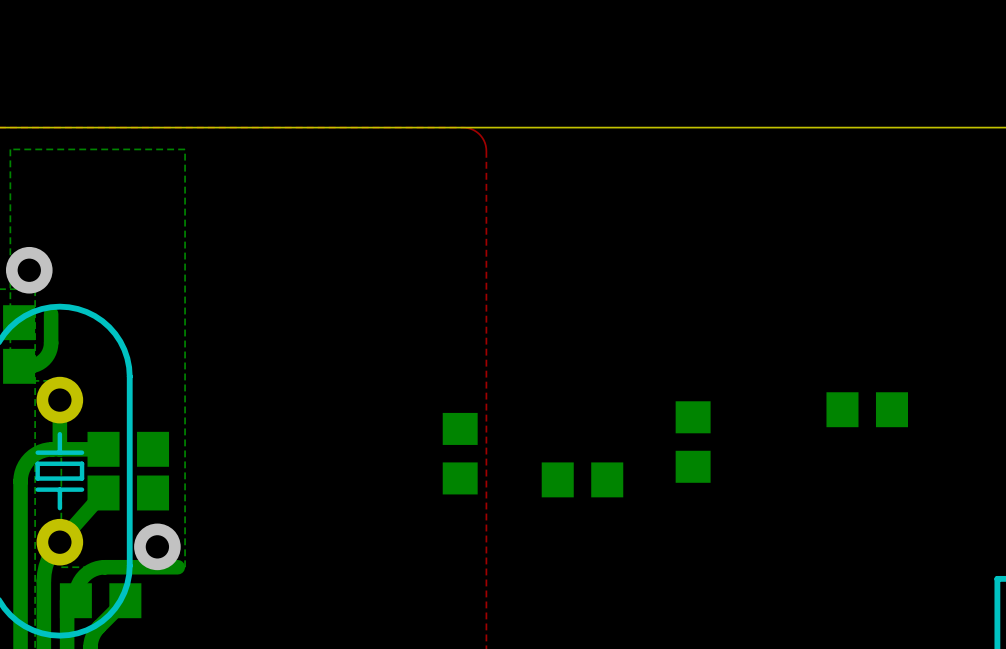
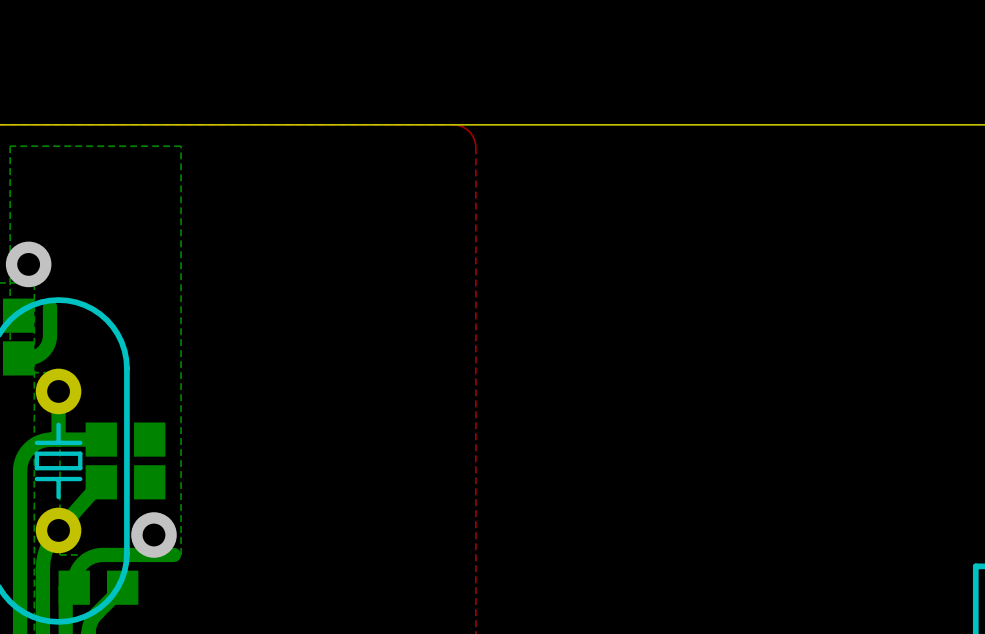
part: (867, 409) -> none
part: (693, 442) -> none
part: (460, 453) -> none
part: (582, 479) -> none

